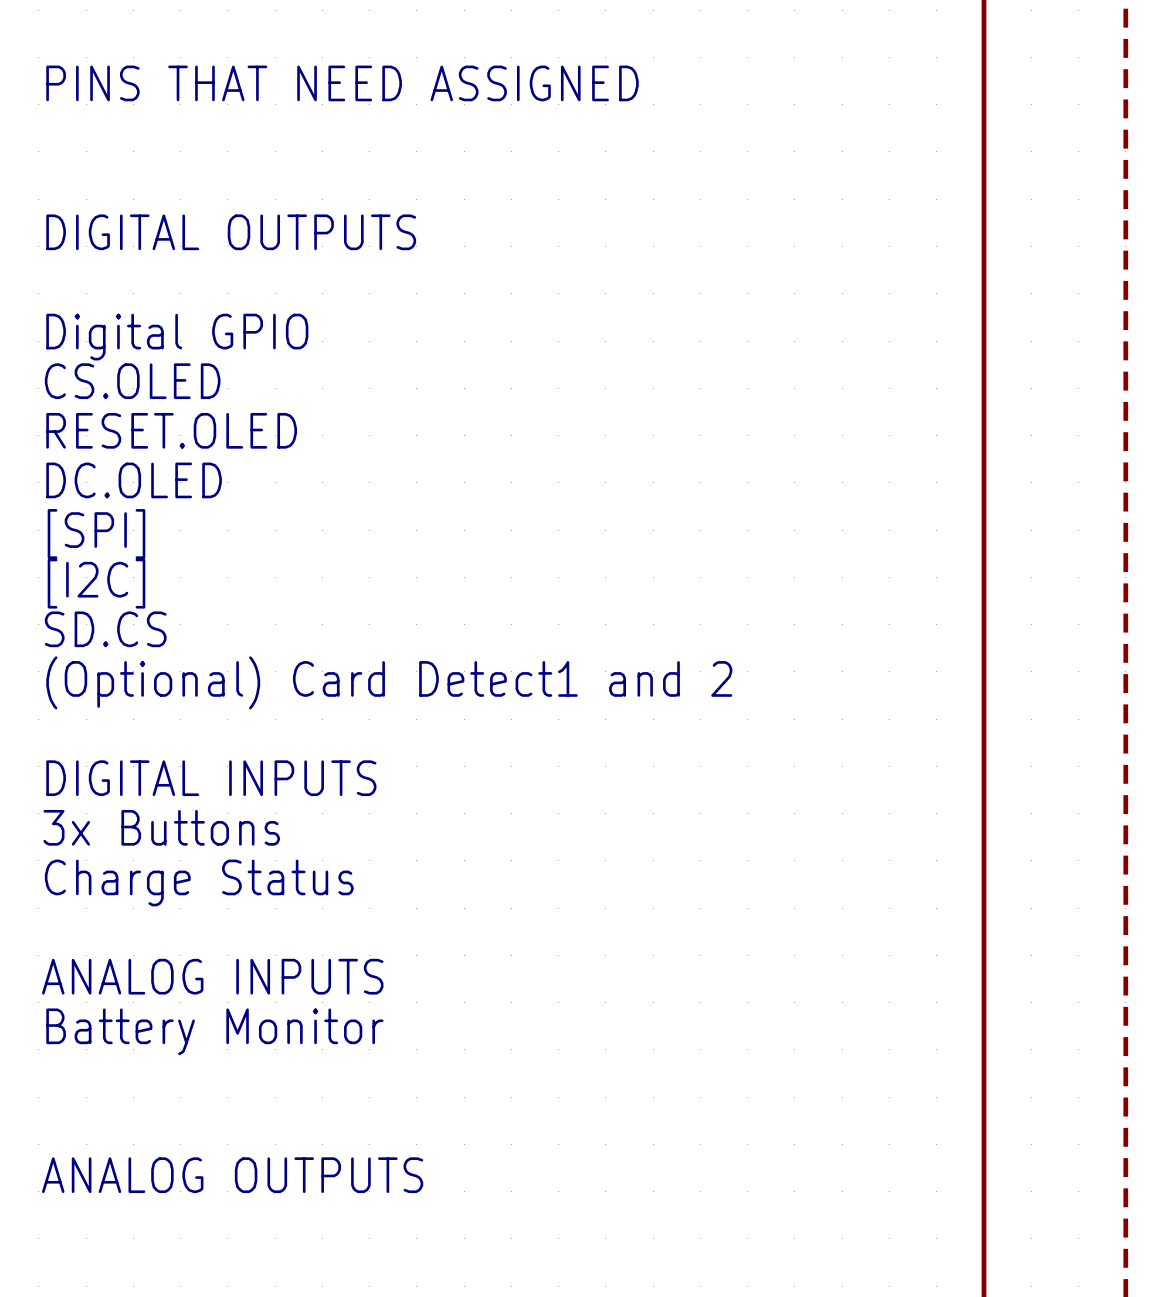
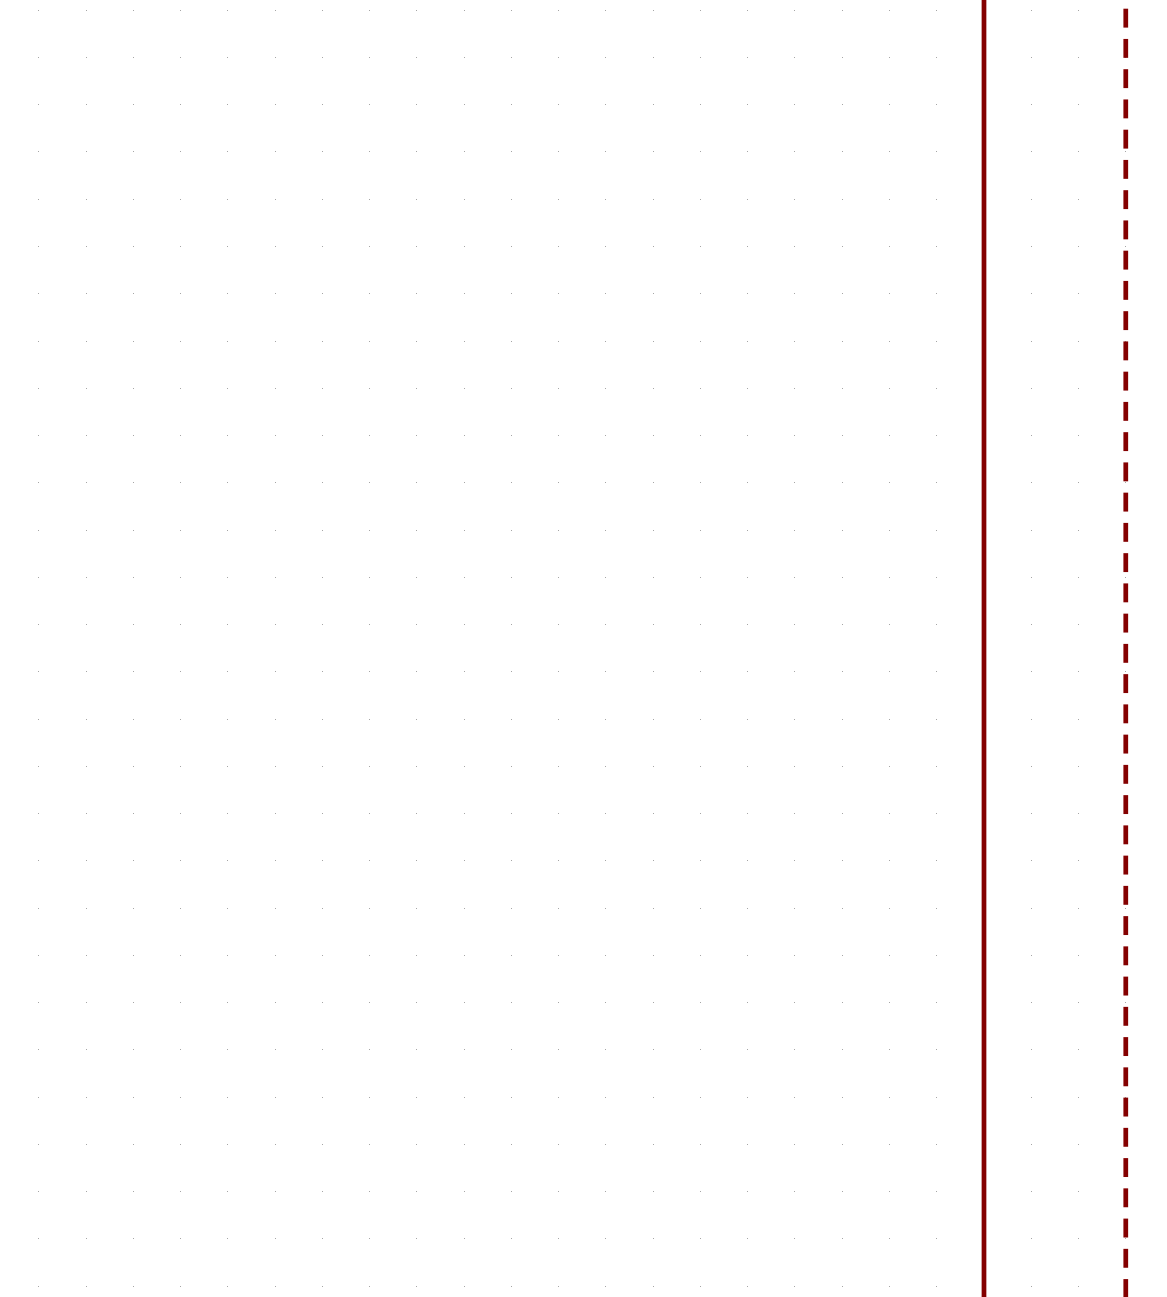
text: PINS THAT NEED ASSIGNED (342, 83) -> none
text: DIGITAL OUTPUTS (231, 232) -> none
text: Digital GPIO (177, 337) -> none
text: CS.OLED (132, 381) -> none
text: RESET.OLED (171, 430) -> none
text: DC.OLED (134, 480) -> none
text: [SPI] (96, 534) -> none
text: [I2C] (96, 583) -> none
text: SD.CS (105, 629) -> none
text: (Optional) Card Detect1 and 2 (389, 682) -> none
text: DIGITAL INPUTS (211, 778) -> none
text: 3x Buttons (161, 827) -> none
text: Charge Status (199, 882) -> none
text: ANALOG INPUTS (212, 976) -> none
text: Battery Monitor (214, 1031) -> none
text: ANALOG OUTPUTS (232, 1175) -> none

